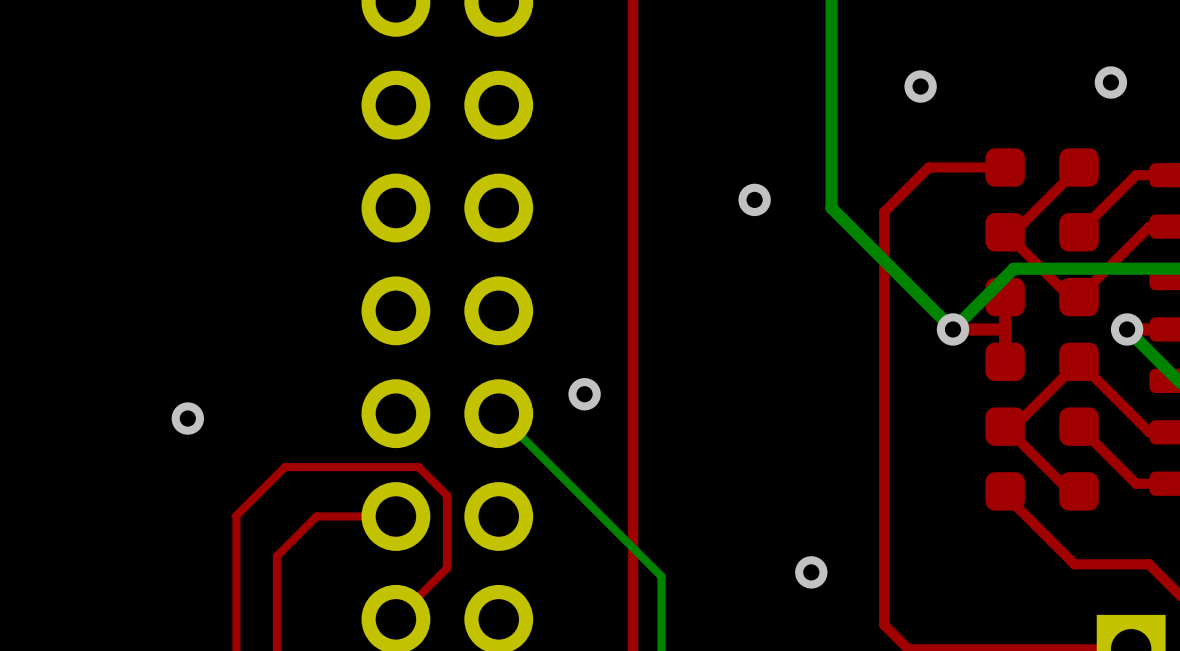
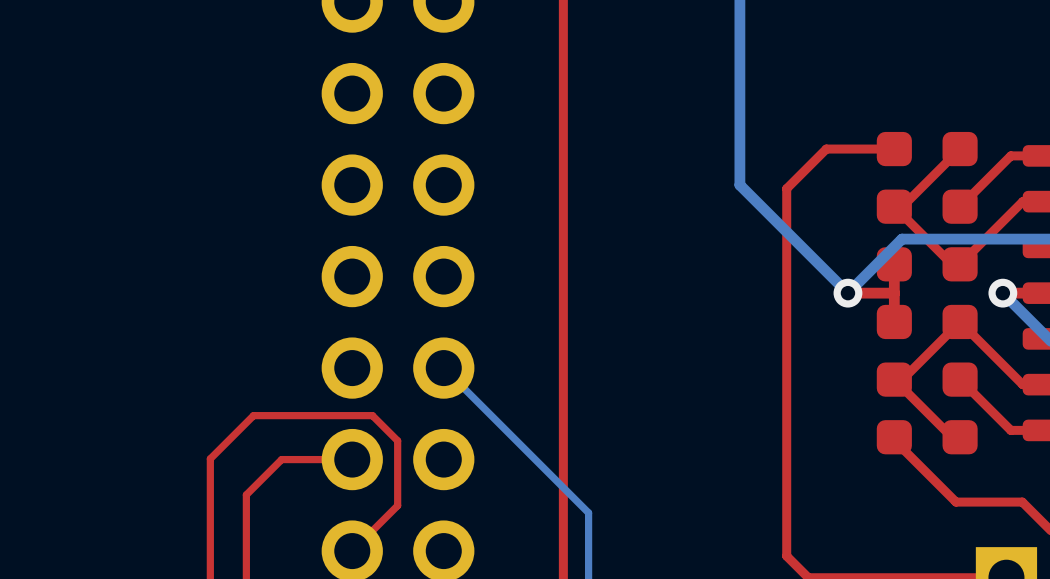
via: (1110, 82) -> none
via: (920, 86) -> none
via: (754, 199) -> none
via: (584, 394) -> none
via: (187, 418) -> none
via: (811, 572) -> none

